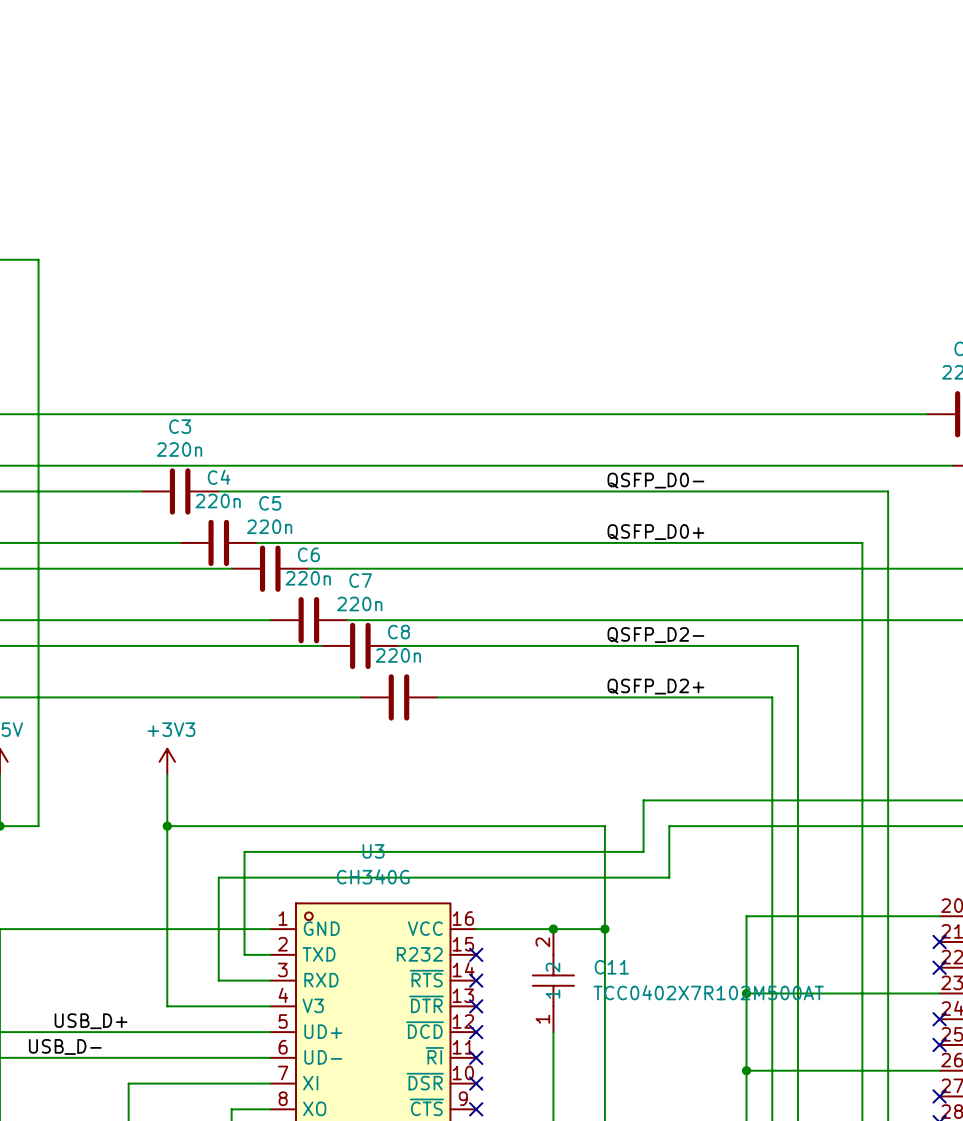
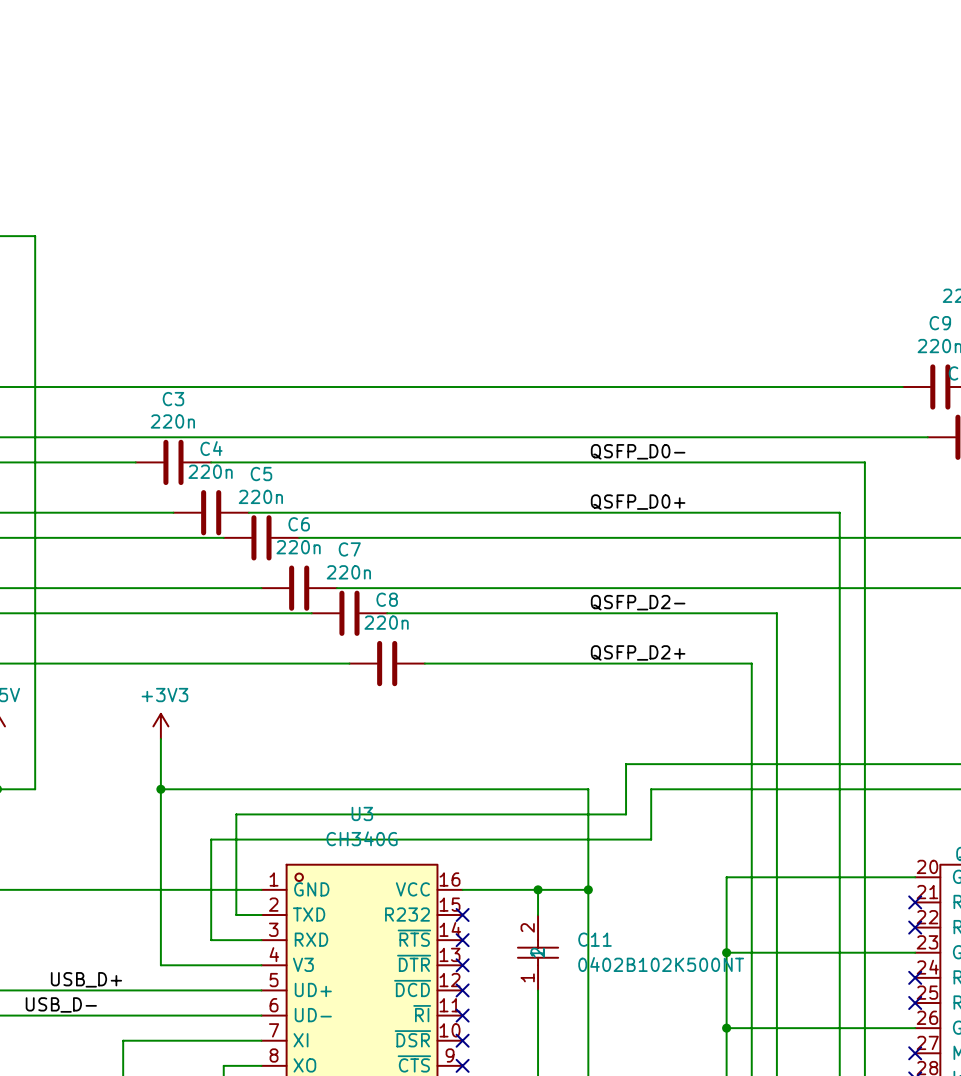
C11 symbol: [532, 929, 575, 1033] -> [517, 915, 559, 991]
C11 value: TCC0402X7R102M500AT (708, 992) -> 0402B102K500NT (661, 964)

